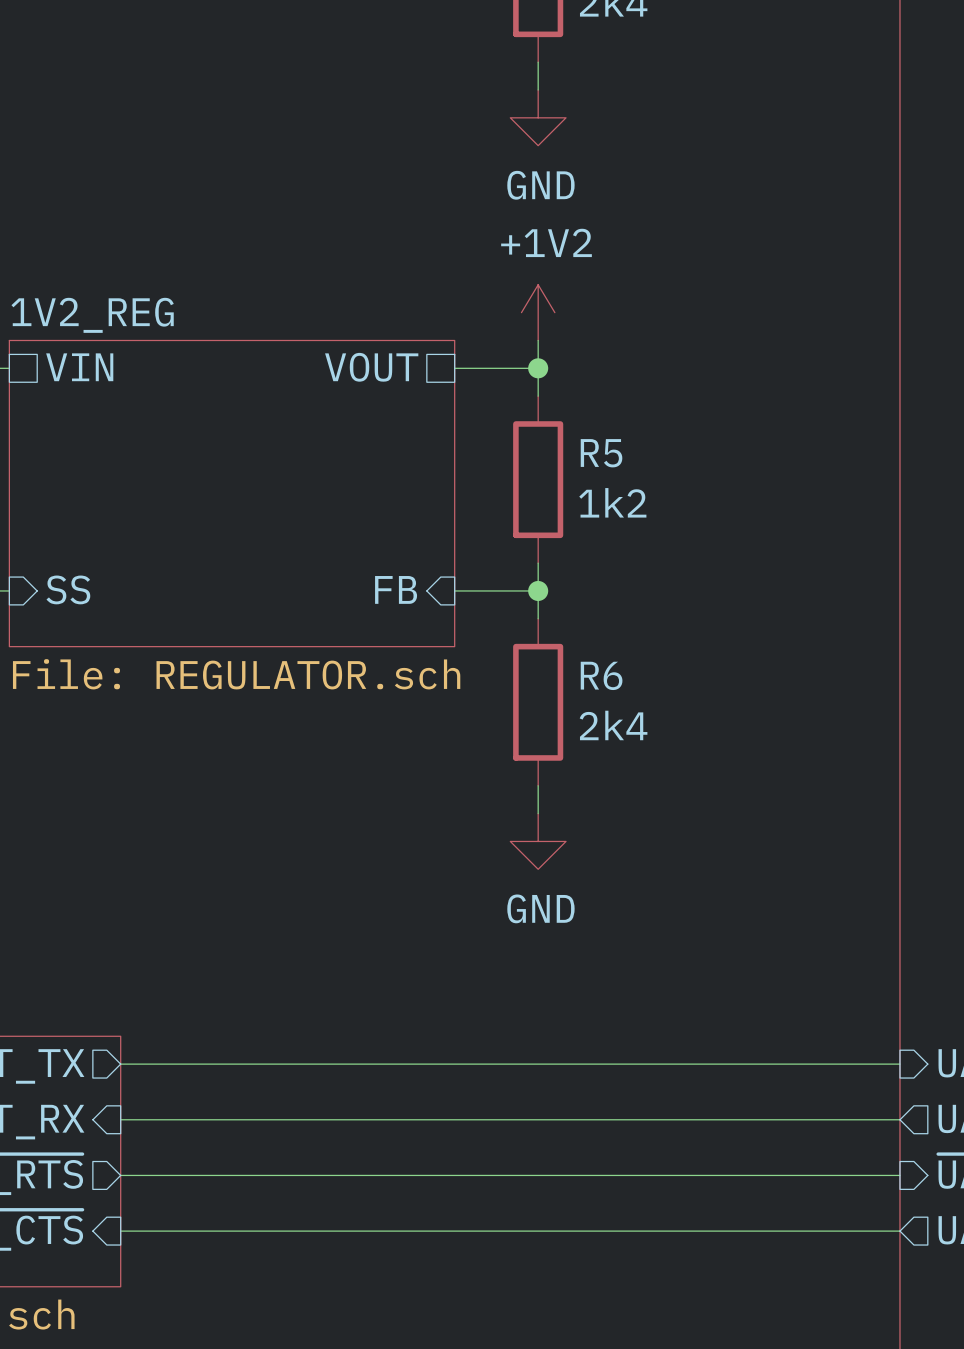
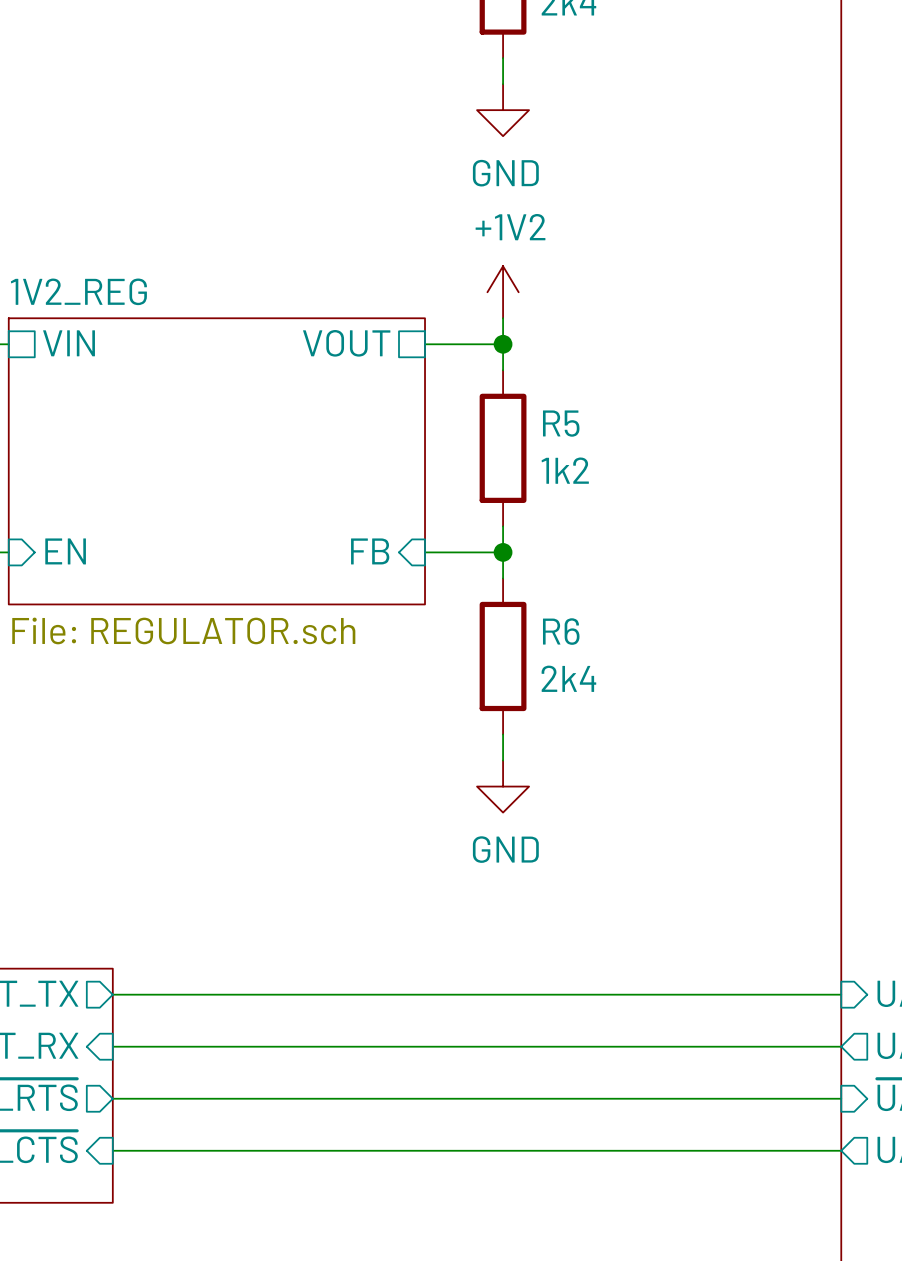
sheet pin: SS (68, 589) -> EN (65, 551)

